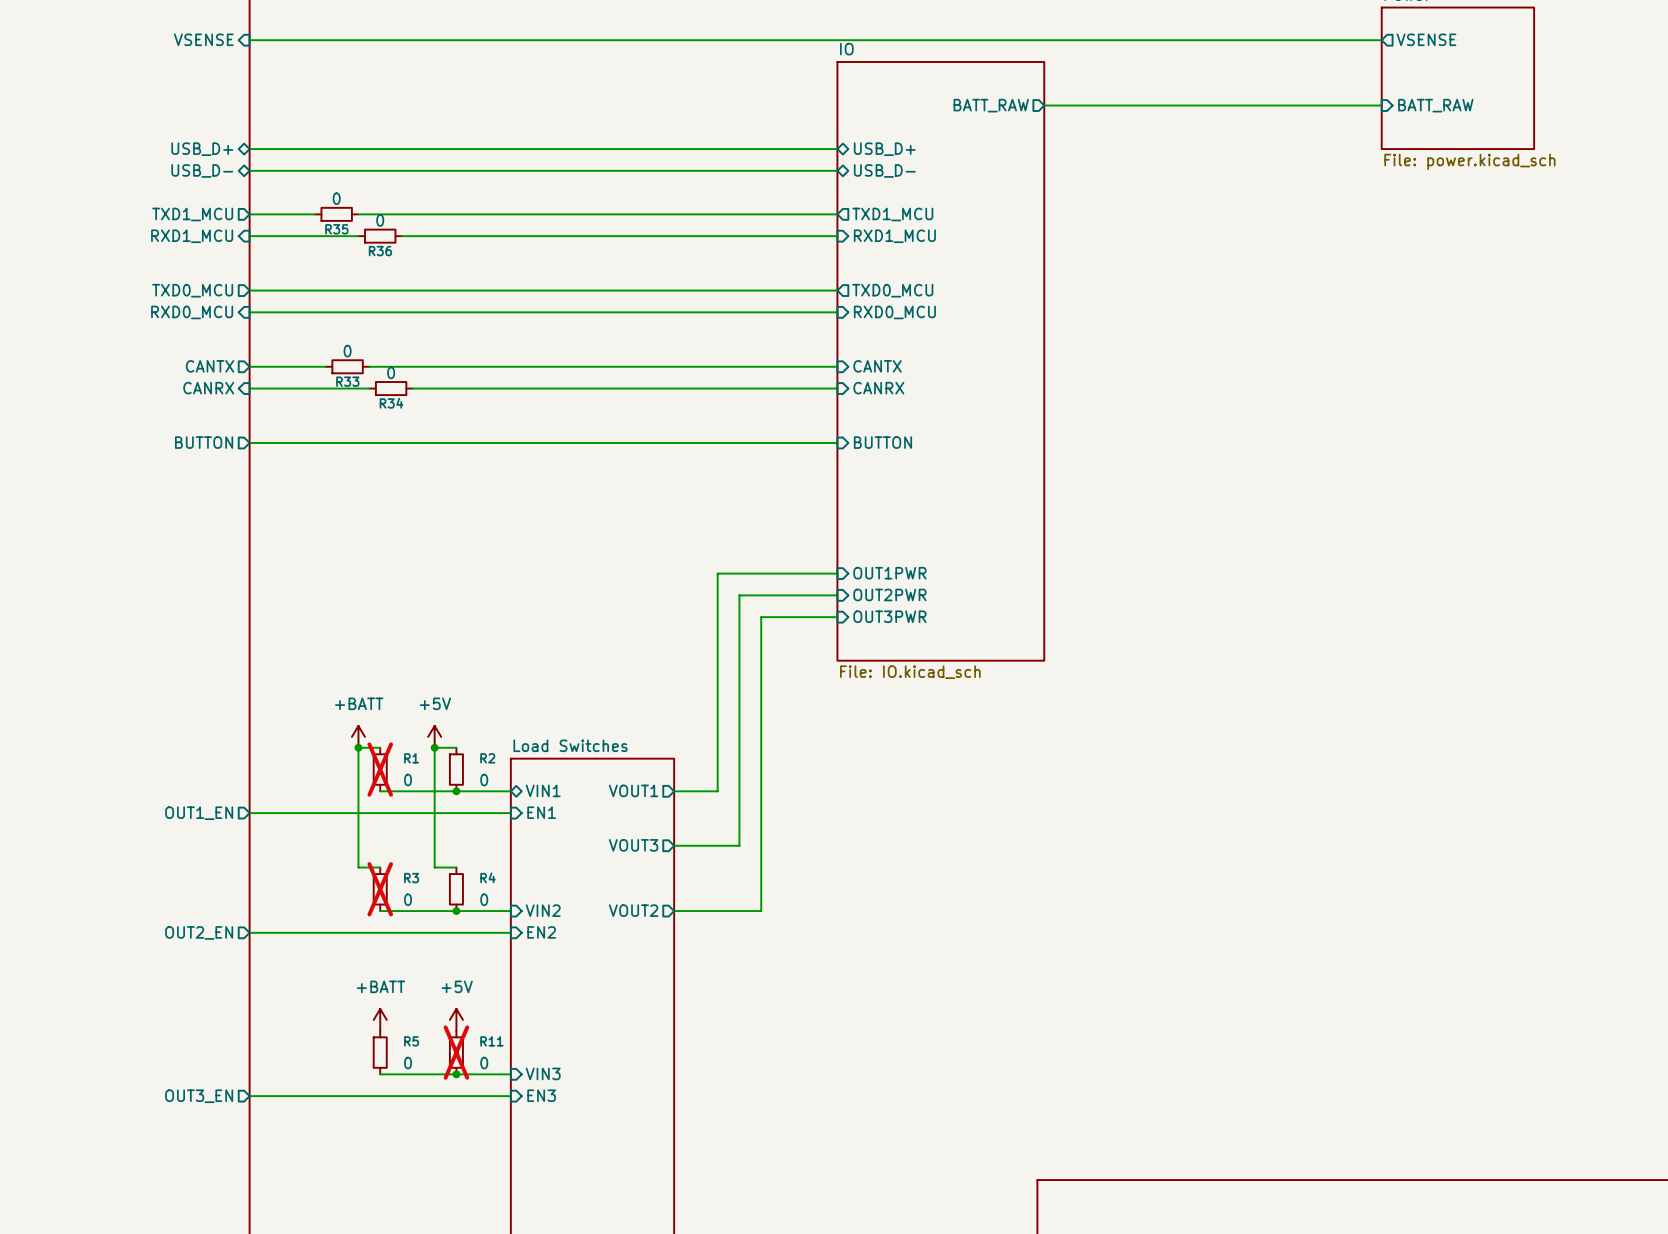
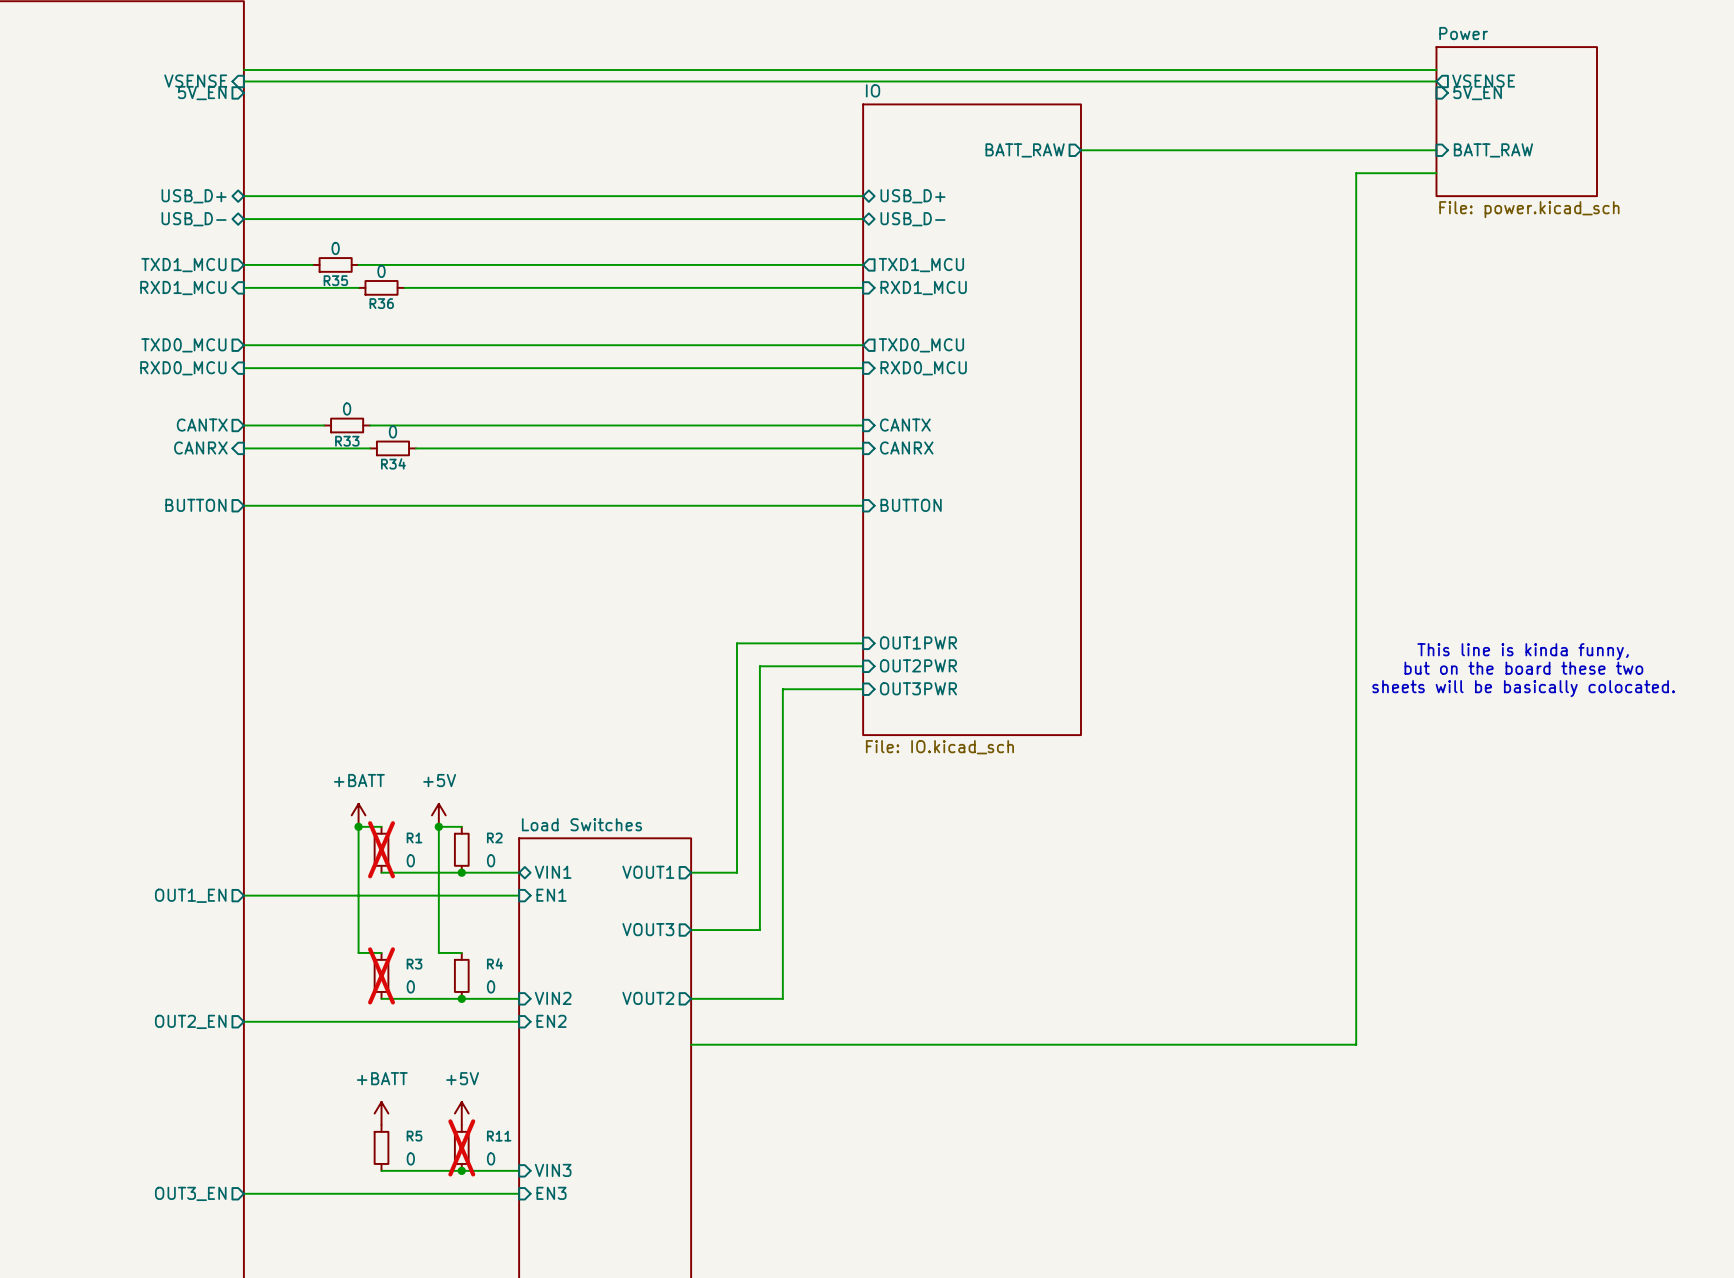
wire: none -> (243, 70) (1436, 70)
sheet pin: none -> 5V_EN (202, 93)
sheet pin: none -> 5V_EN (1477, 93)
wire: none -> (1436, 173) (1356, 173) (1356, 1044) (691, 1044)
text: none -> This line is kinda funny, (1523, 651)
text: none -> but on the board these two (1523, 668)
text: none -> sheets will be basically colocated. (1523, 688)

